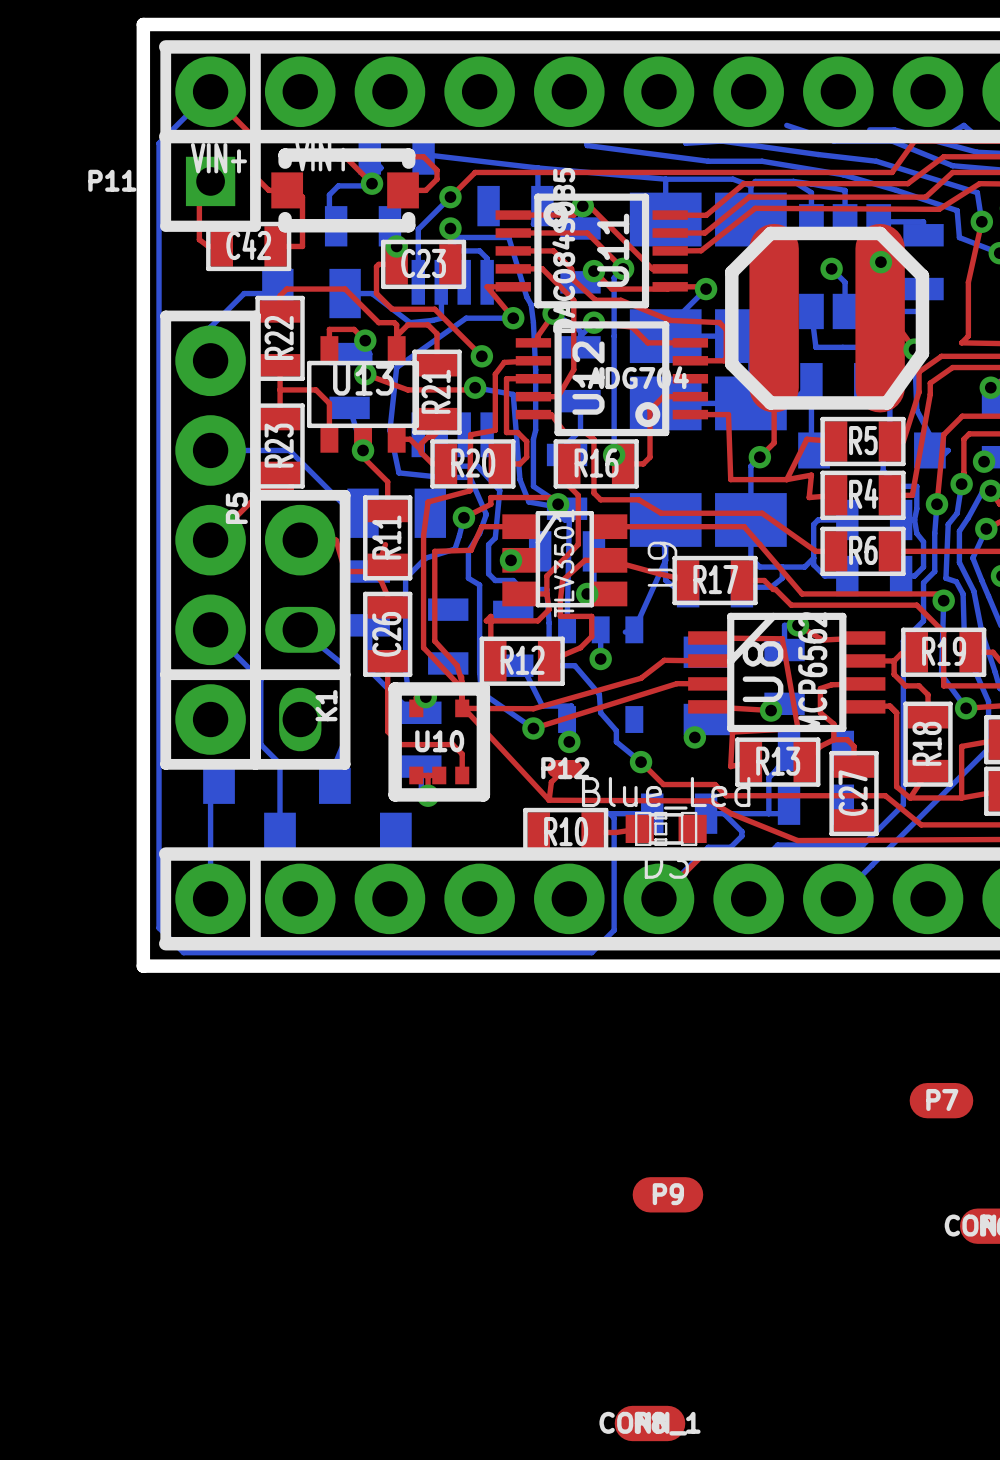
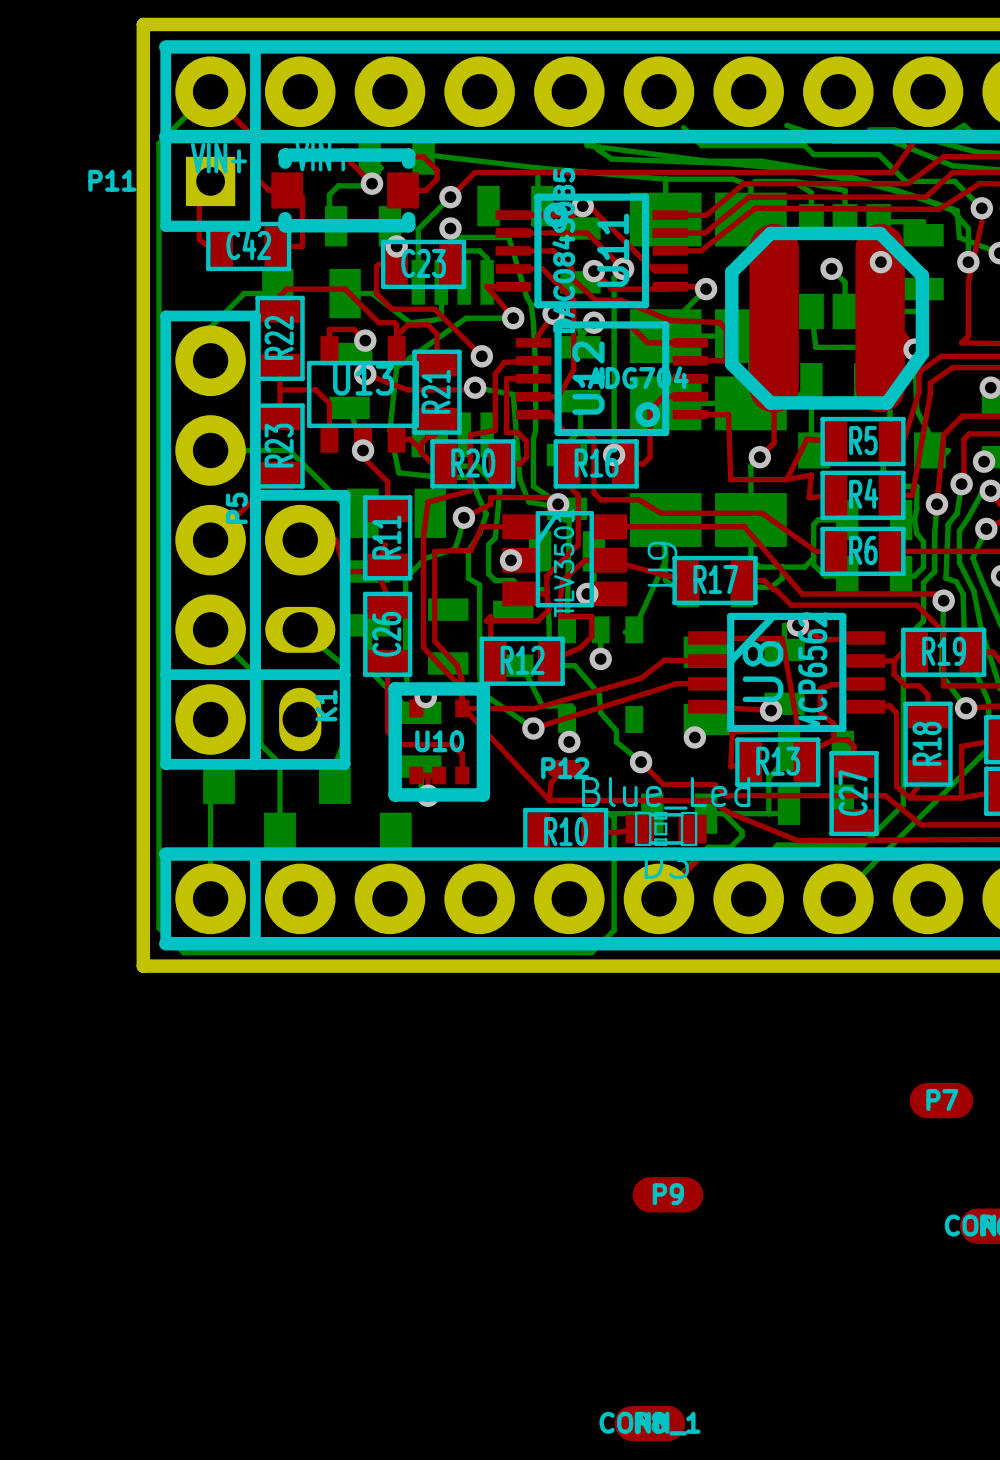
bottom track: none -> (683, 127) (701, 145) (804, 145) (813, 154) (878, 154) (905, 181) (954, 181) (981, 208)
bottom track: (683, 134) (685, 143) (721, 141) (876, 161) (977, 192) (981, 221) -> none
bottom track: none -> (589, 141) (611, 159) (728, 163) (797, 170) (858, 181) (923, 199) (952, 210) (968, 228) (968, 262)
via position: (981, 221) -> (981, 208)
via: none -> (968, 262)

